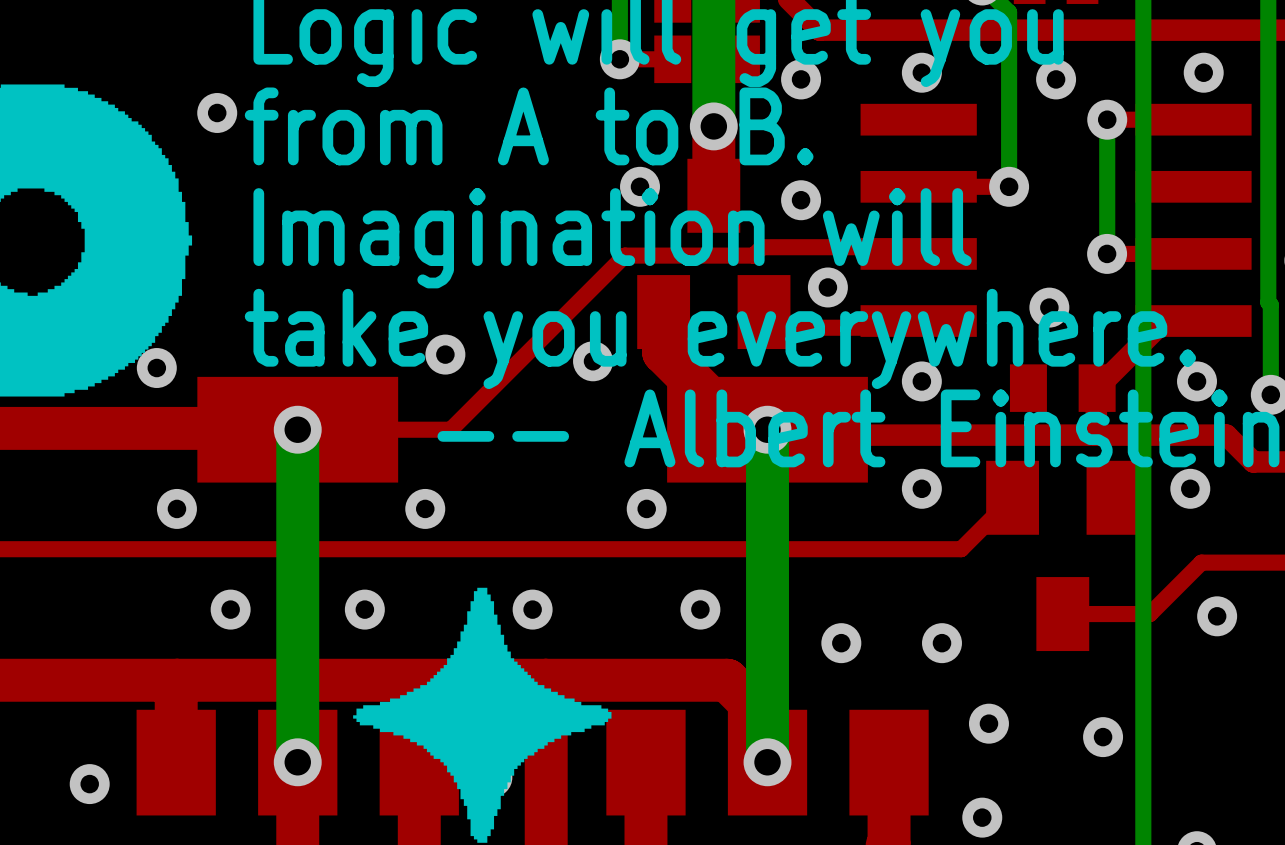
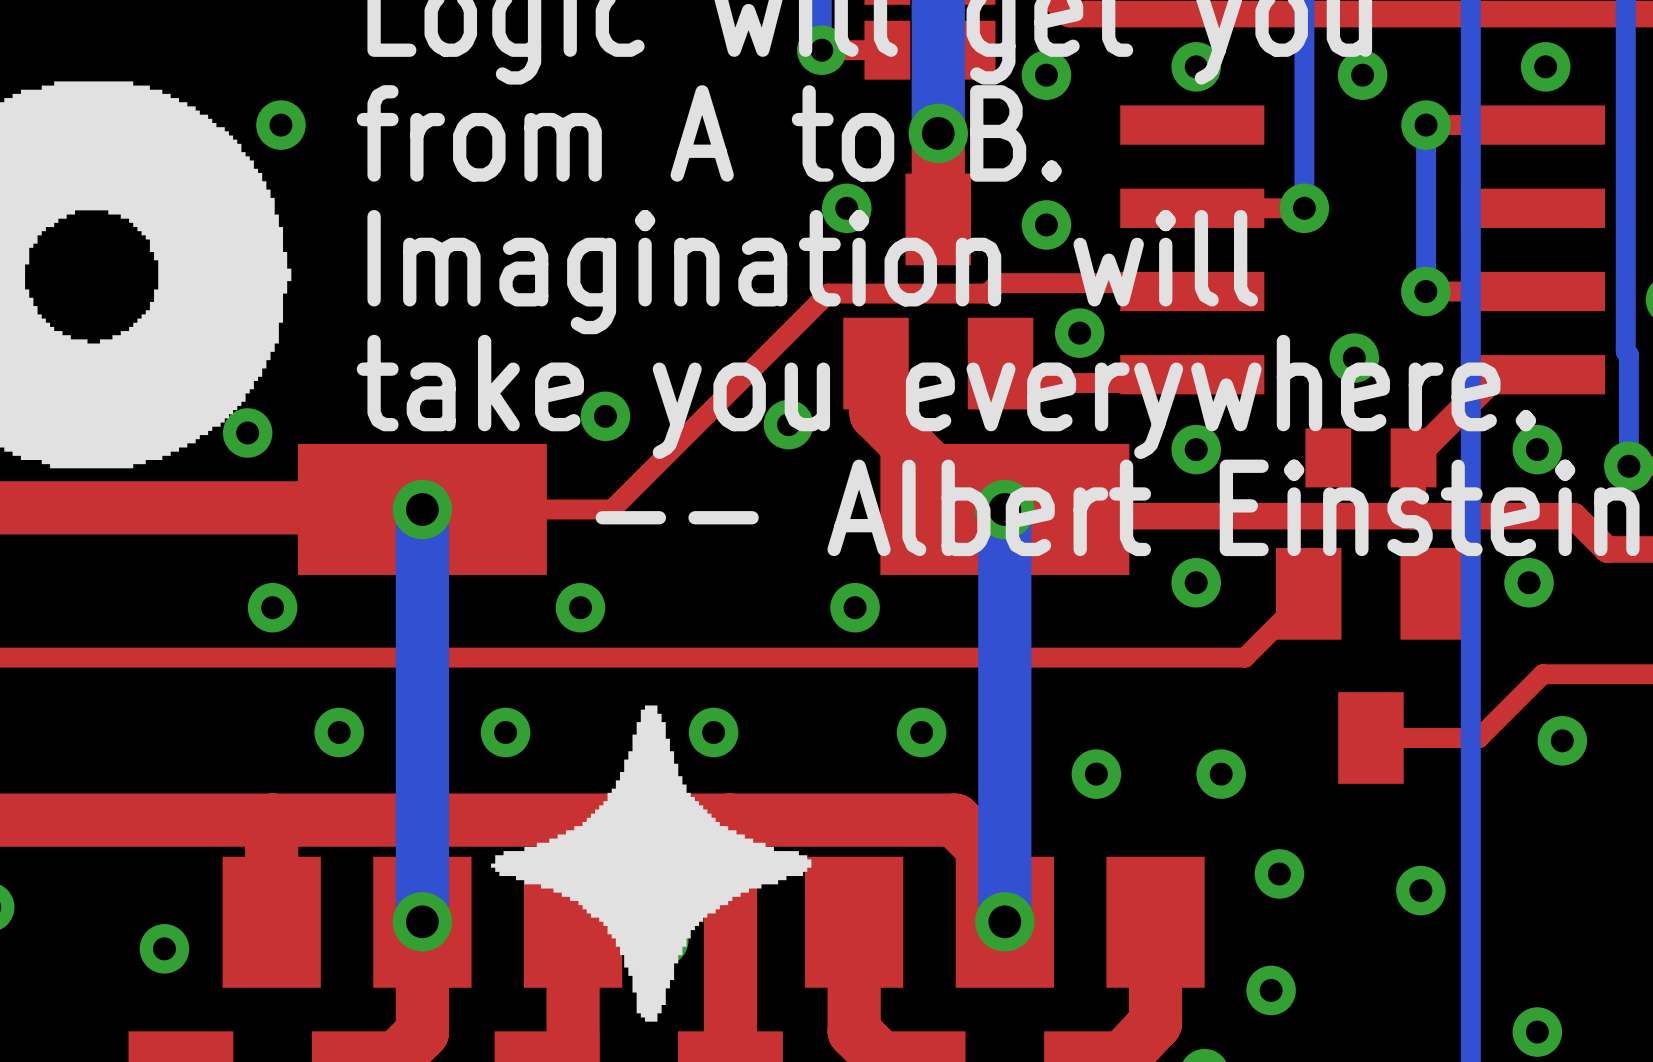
via position: (217, 112) -> (280, 125)

